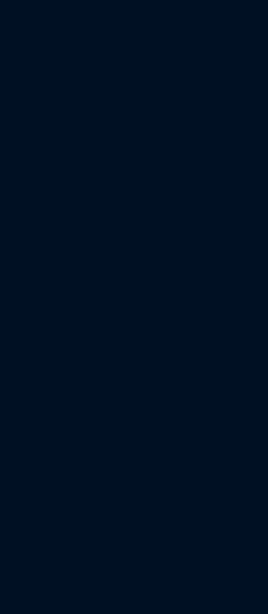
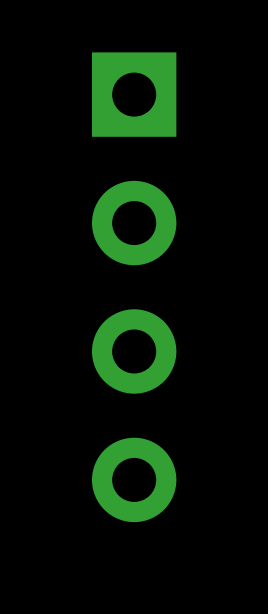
part: none -> (134, 287)

